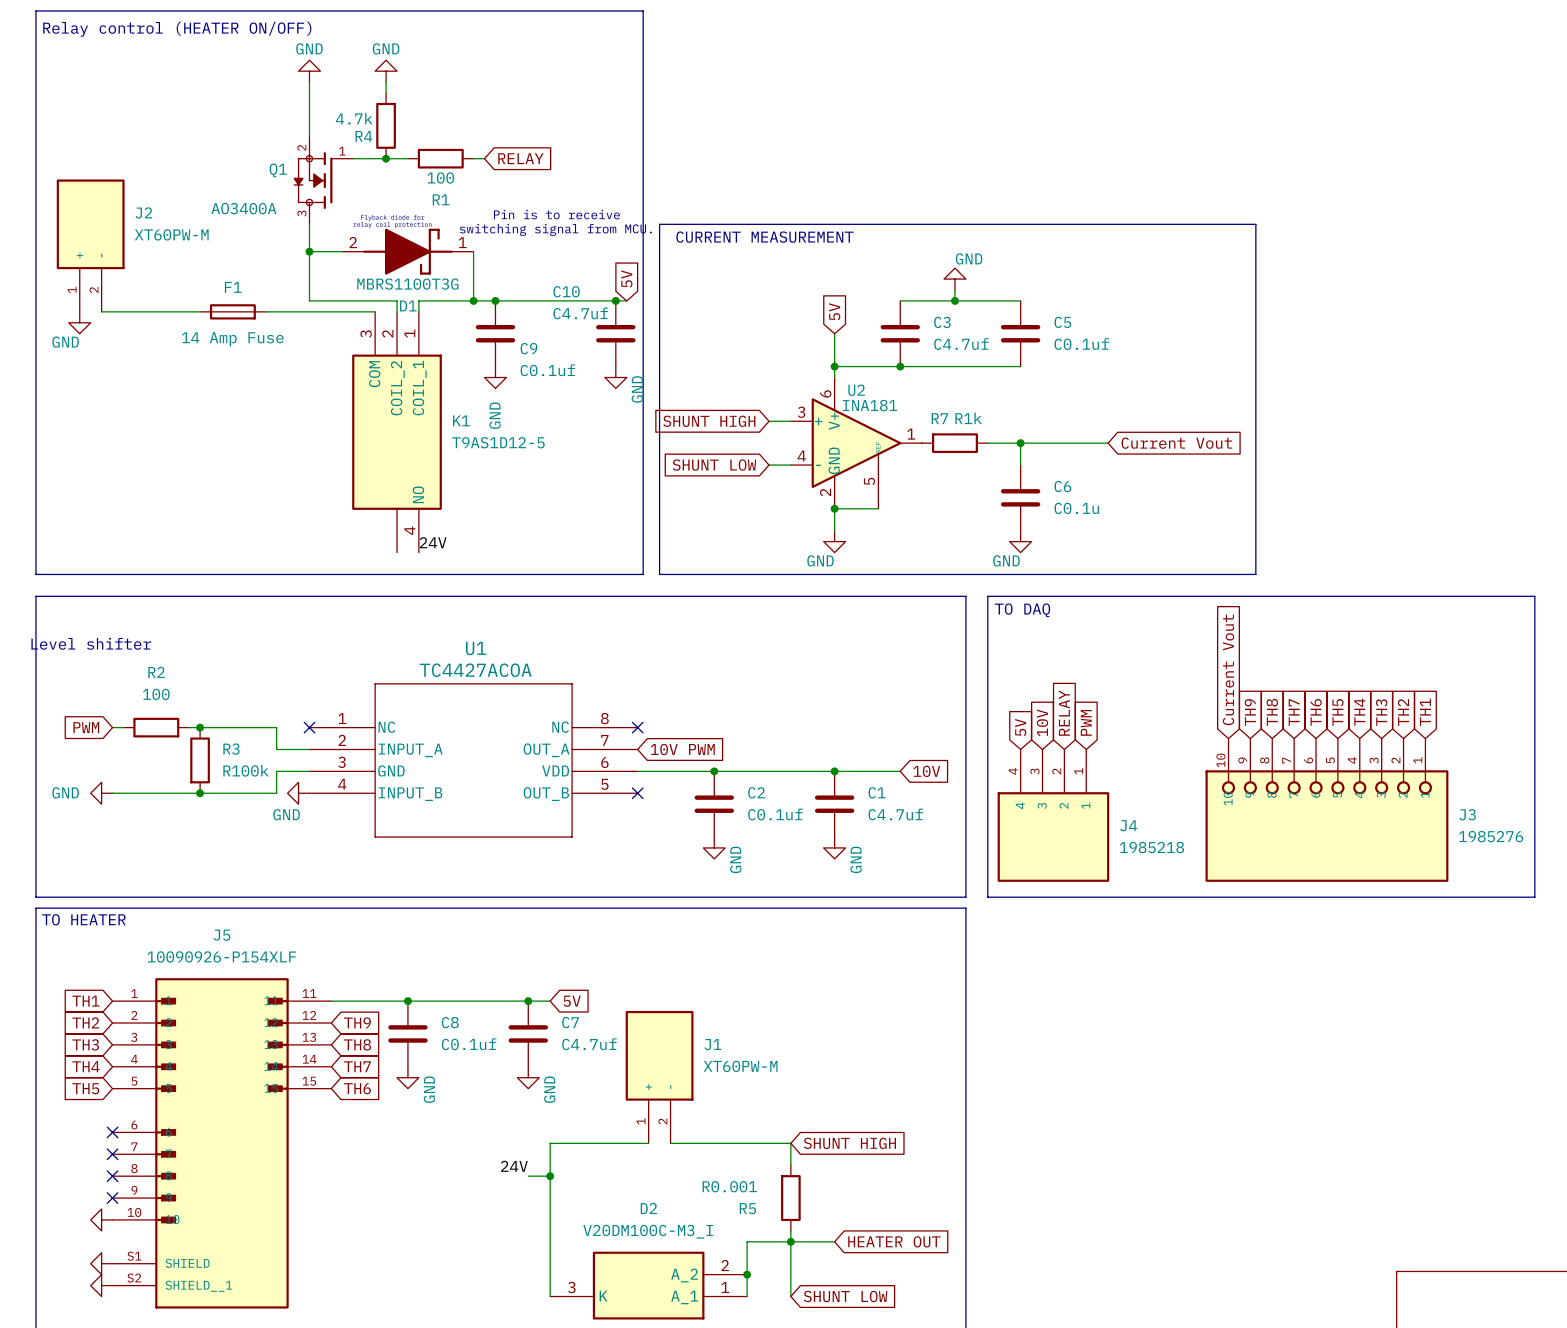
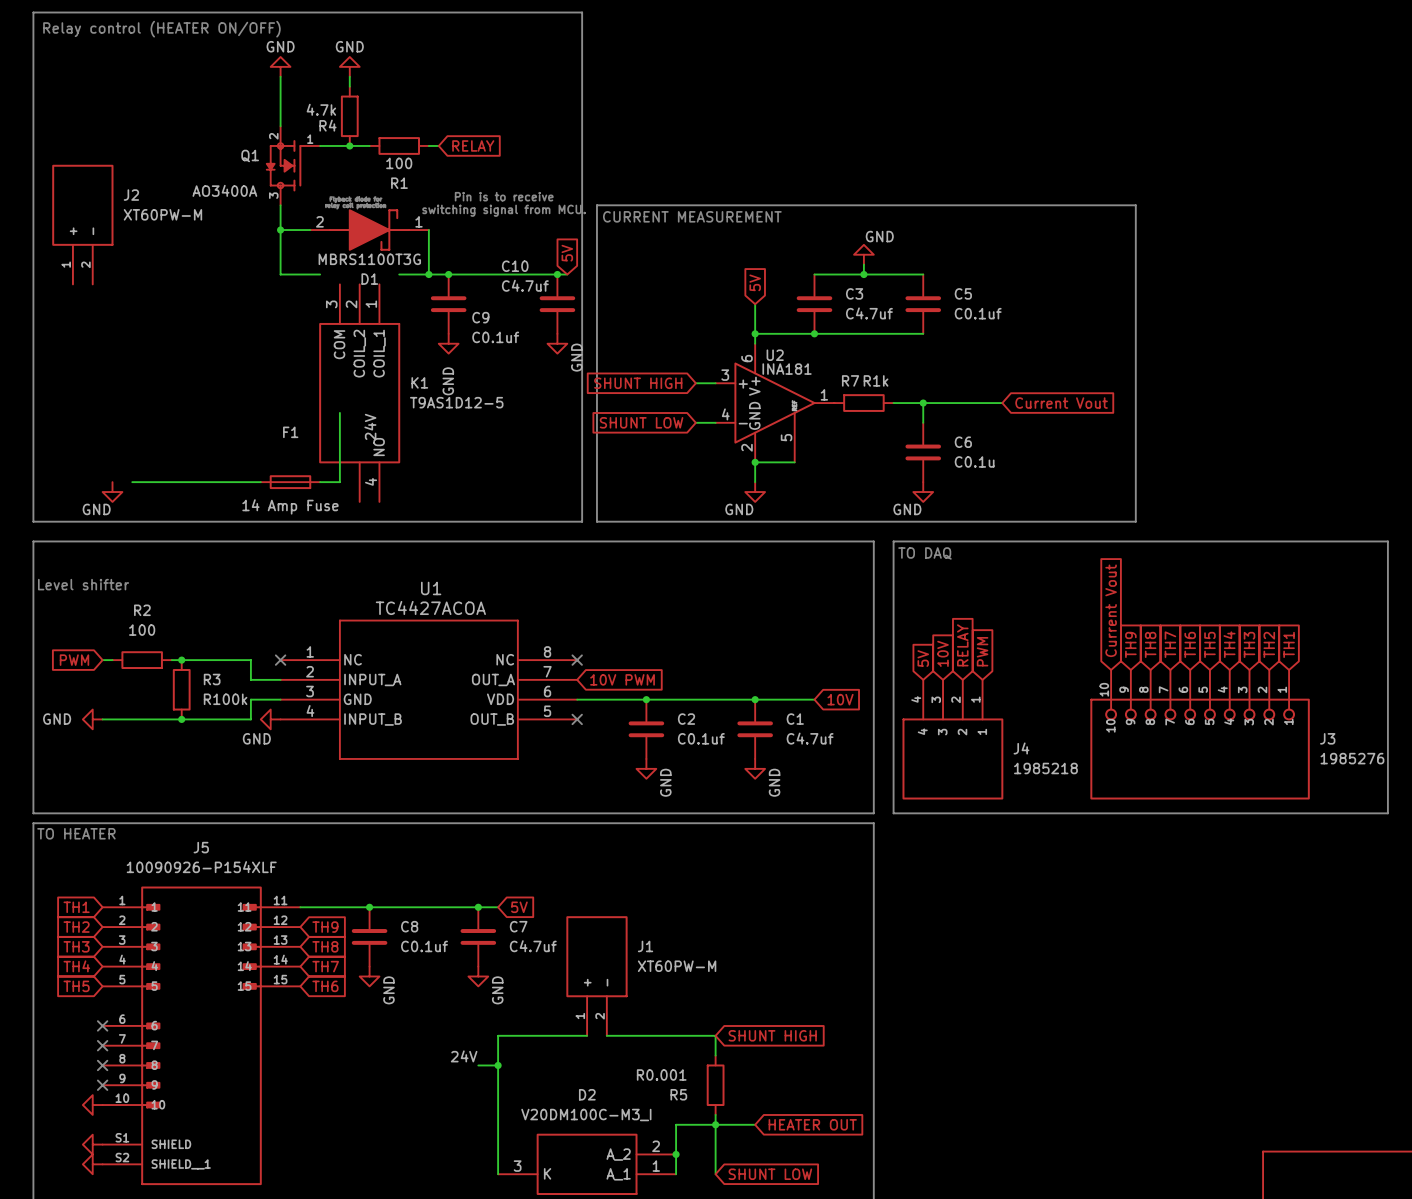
F1 name position: F1 (233, 287) -> F1 (290, 432)
wire: (353, 300) (397, 300) (397, 311) -> none
wire: (440, 300) (418, 300) (418, 311) -> none
wire: (101, 311) (200, 311) -> none
F1 position: (232, 311) -> (290, 482)
wire: (265, 311) (375, 311) -> none
power symbol: GND (79, 322) -> none
wire: none -> (339, 412) (339, 482) (320, 482)
wire: none -> (132, 482) (260, 482)
power symbol: none -> GND (112, 492)
label rotation: 0° (433, 542) -> 90° counterclockwise (370, 427)
label position: 24V (433, 542) -> 24V (370, 427)

